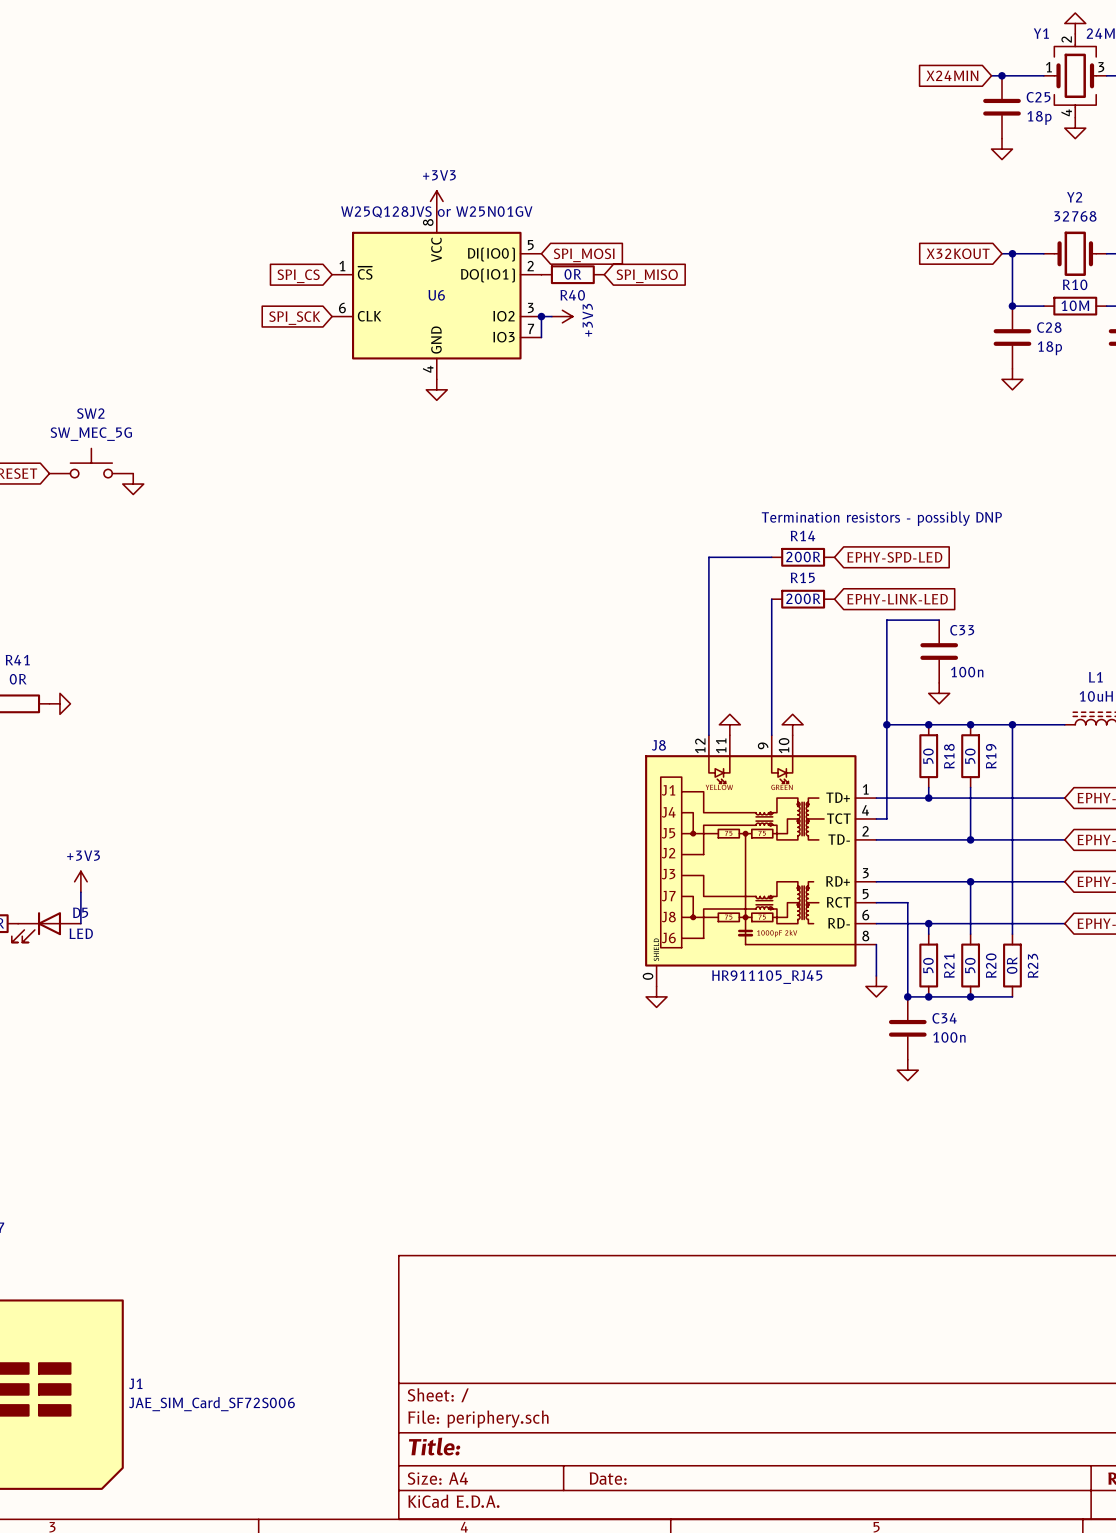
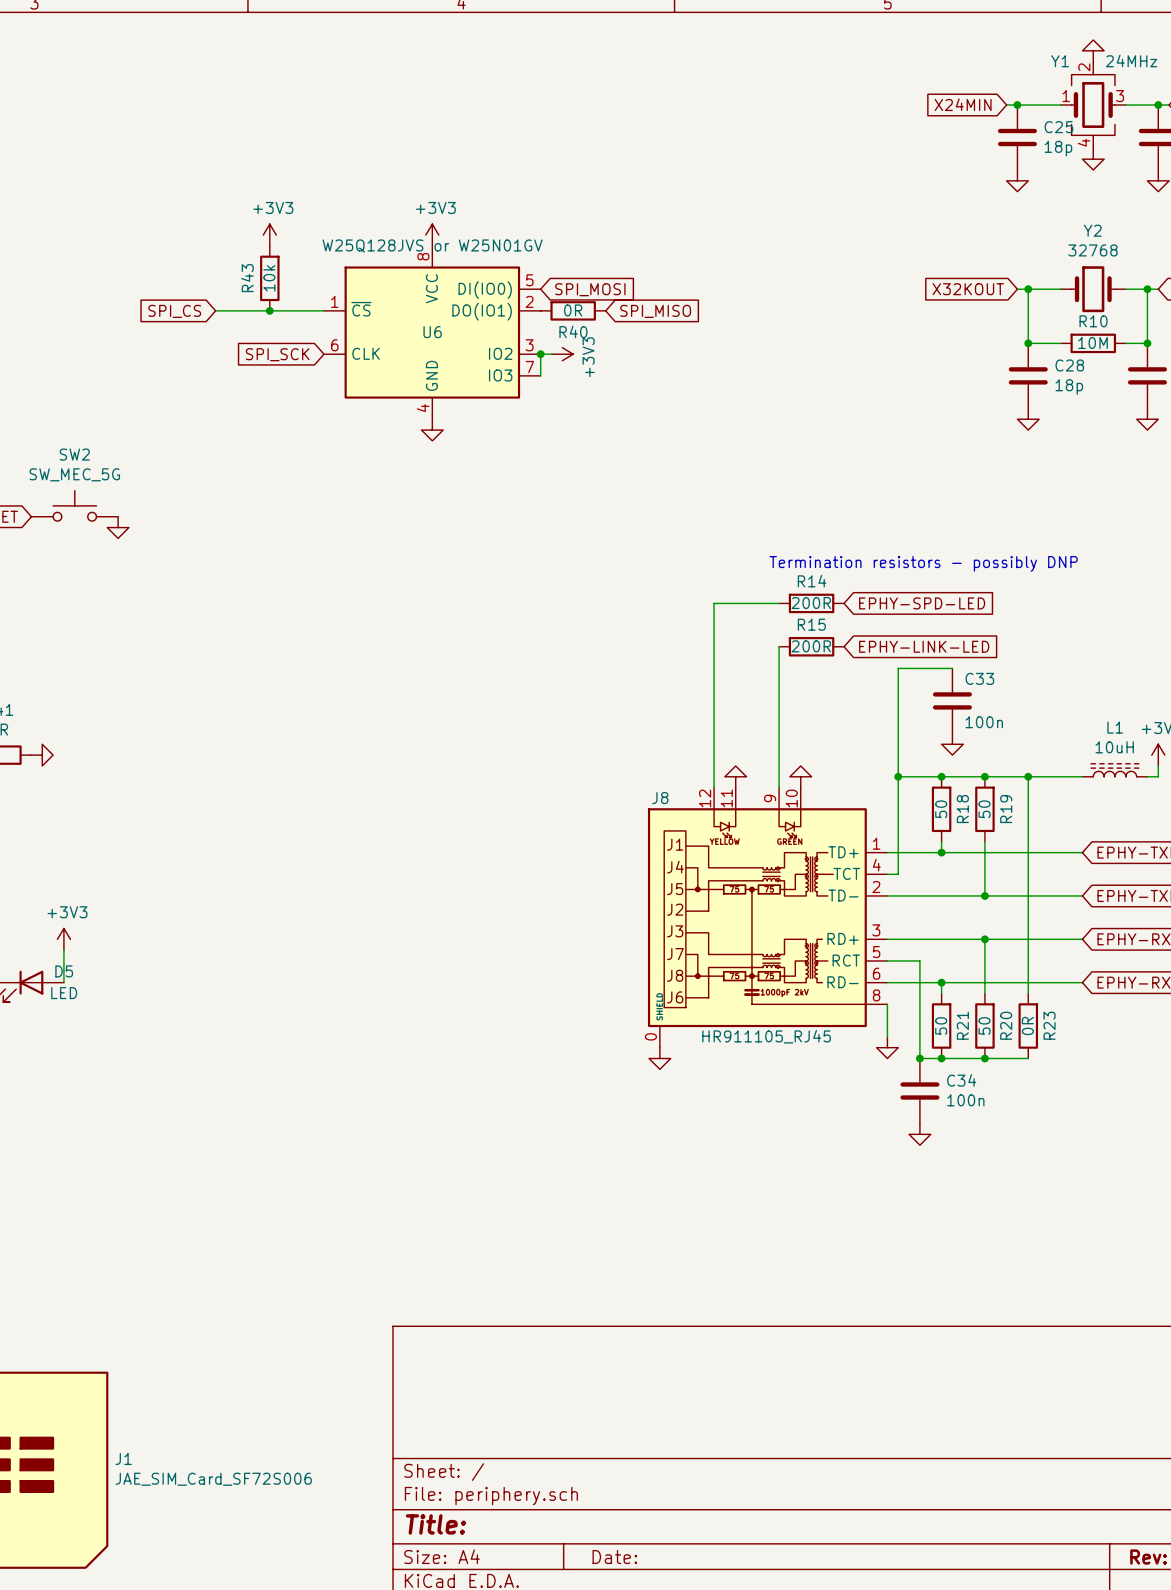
power symbol: none -> +3V3 (269, 235)
R43: none -> 10k (269, 278)
wire: none -> (215, 310) (323, 310)
junction: none -> (269, 310)
global label position: SPI_CS (298, 276) -> SPI_CS (174, 311)

